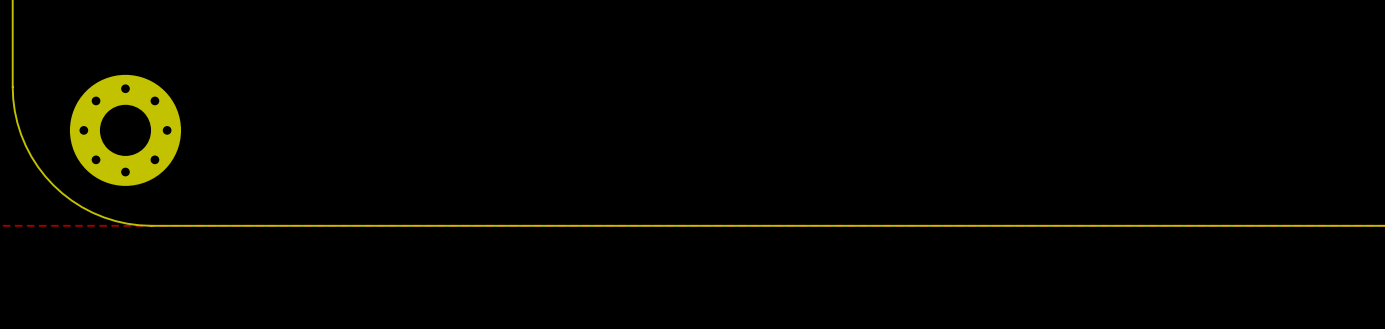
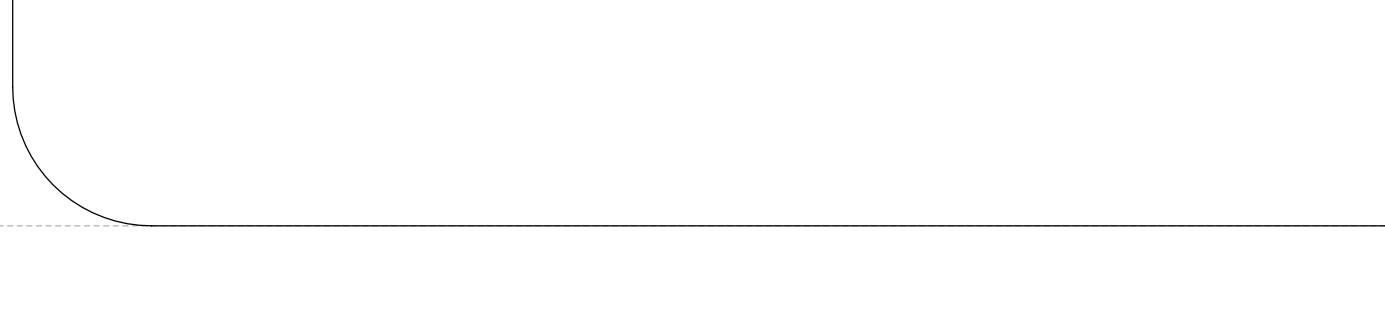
part: (125, 130) -> none

